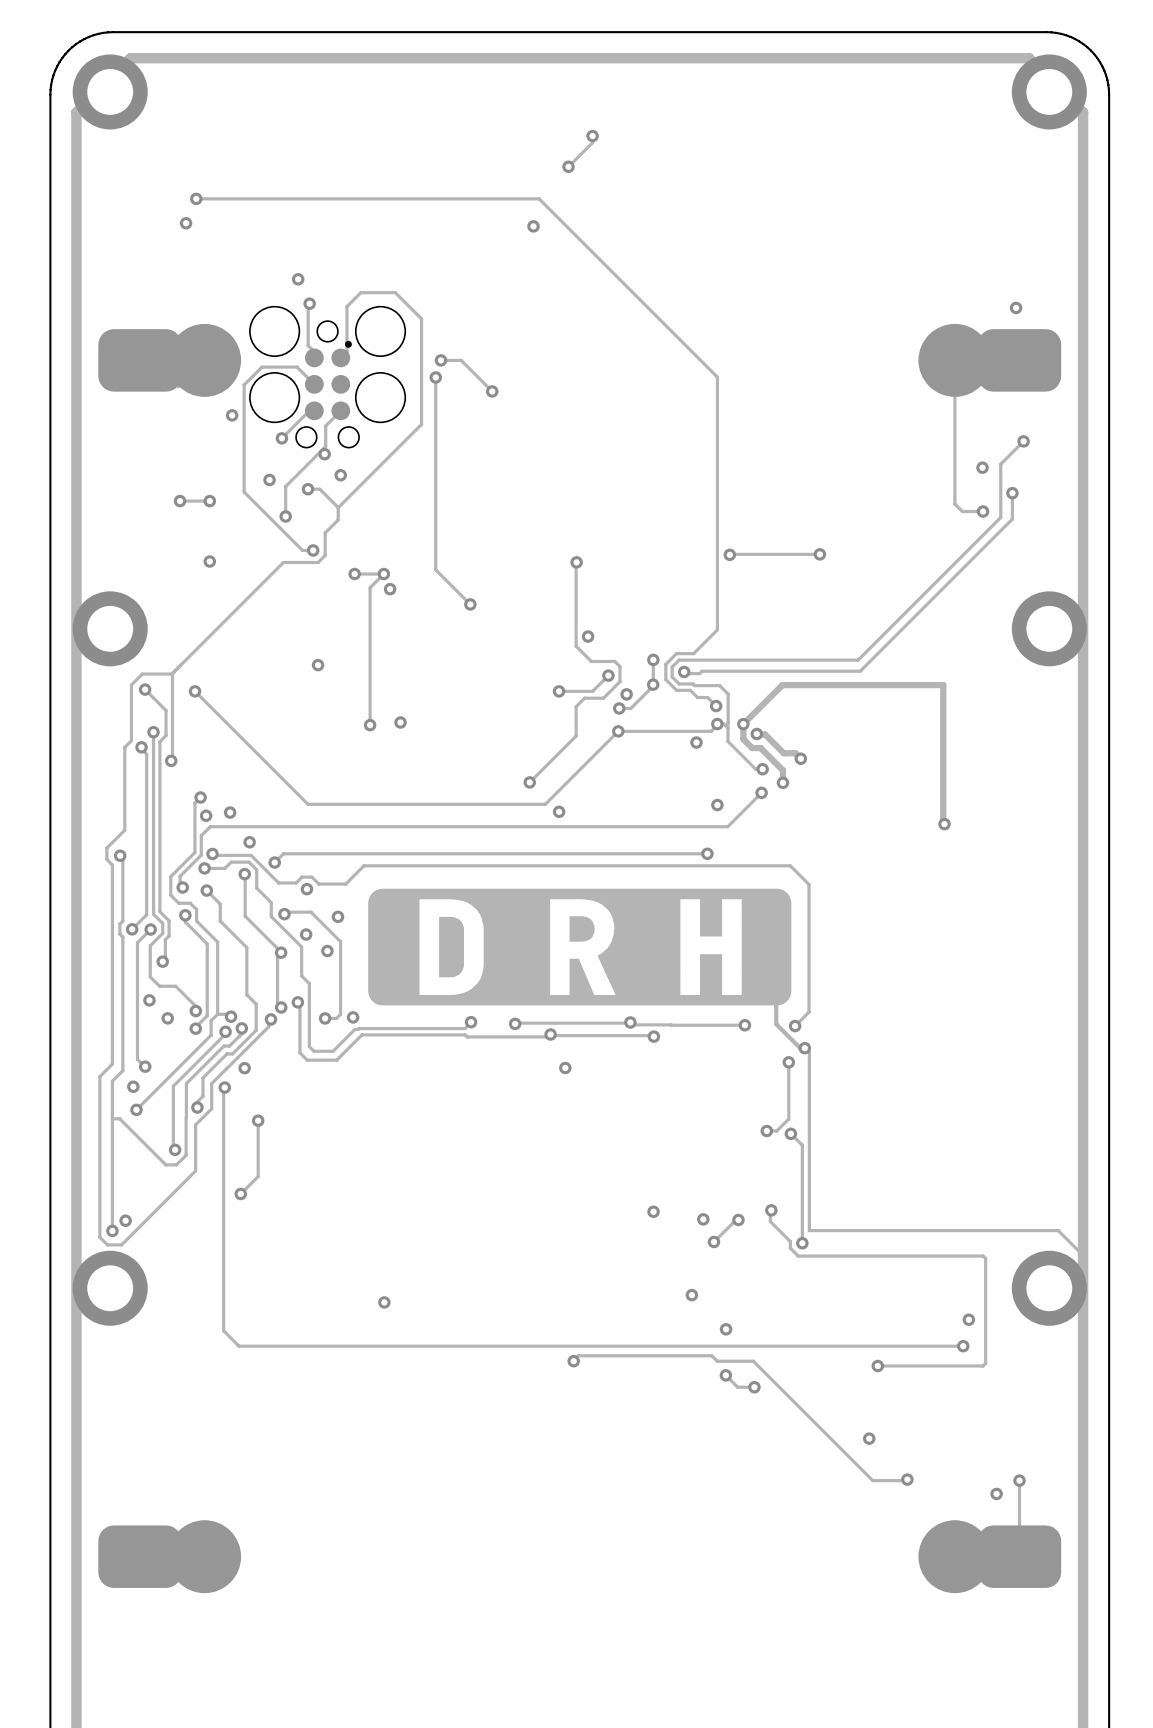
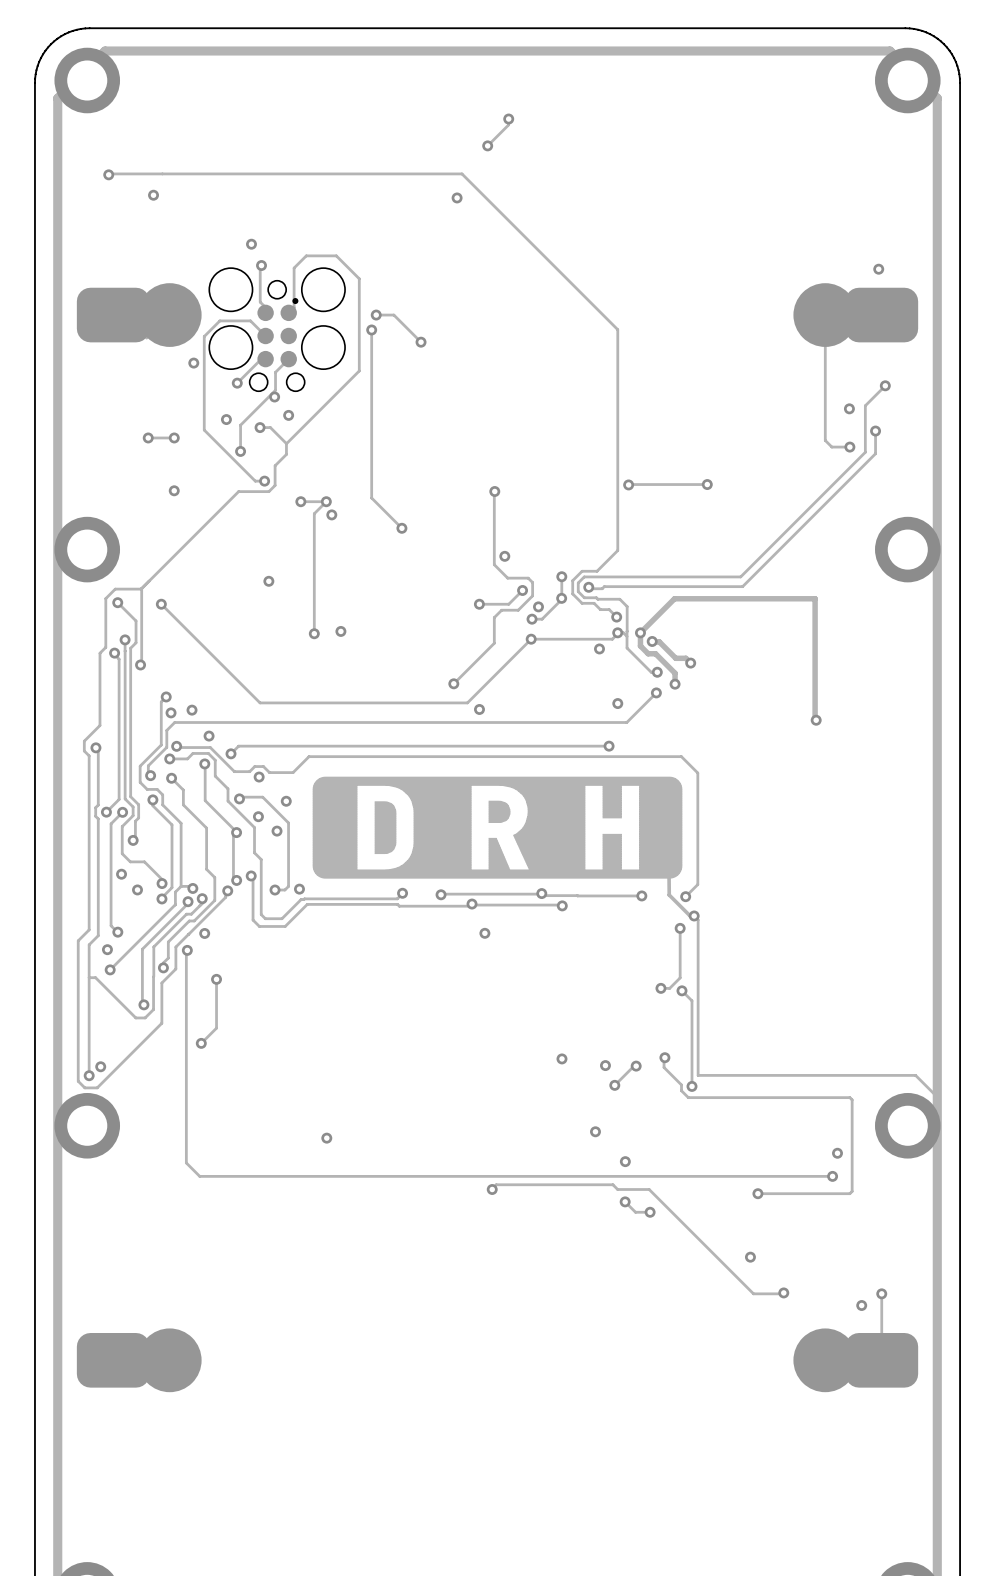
track: none -> (162, 173) (108, 174)
via position: (196, 198) -> (108, 174)

